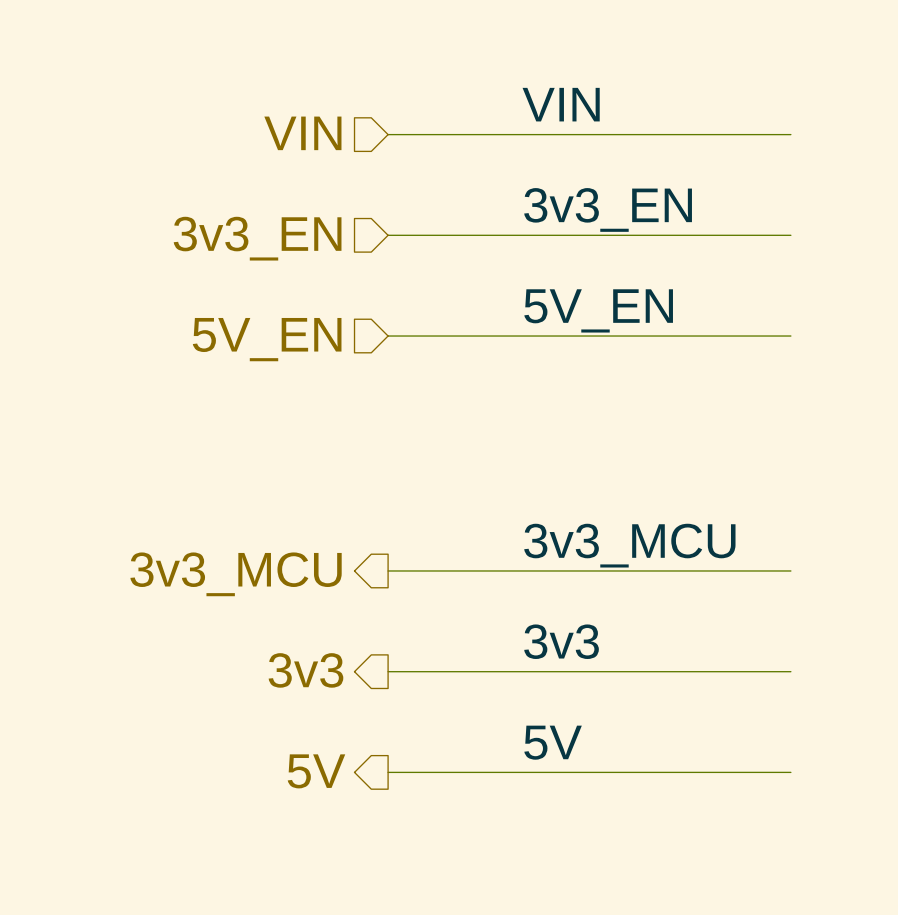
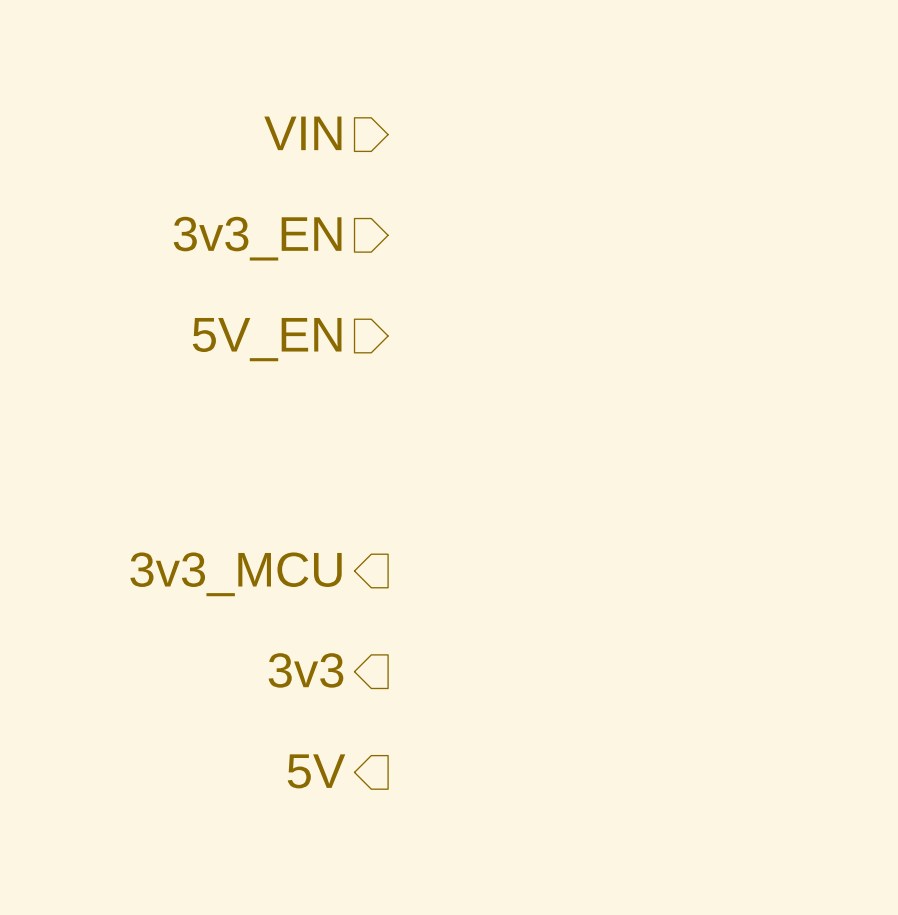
label: VIN (561, 104) -> none
wire: (388, 134) (790, 134) -> none
label: 3v3_EN (608, 209) -> none
wire: (388, 235) (790, 235) -> none
label: 5V_EN (598, 310) -> none
wire: (388, 336) (790, 336) -> none
label: 3v3_MCU (629, 545) -> none
wire: (388, 570) (790, 570) -> none
label: 3v3 (561, 641) -> none
wire: (388, 671) (790, 671) -> none
label: 5V (553, 742) -> none
wire: (388, 772) (790, 772) -> none

